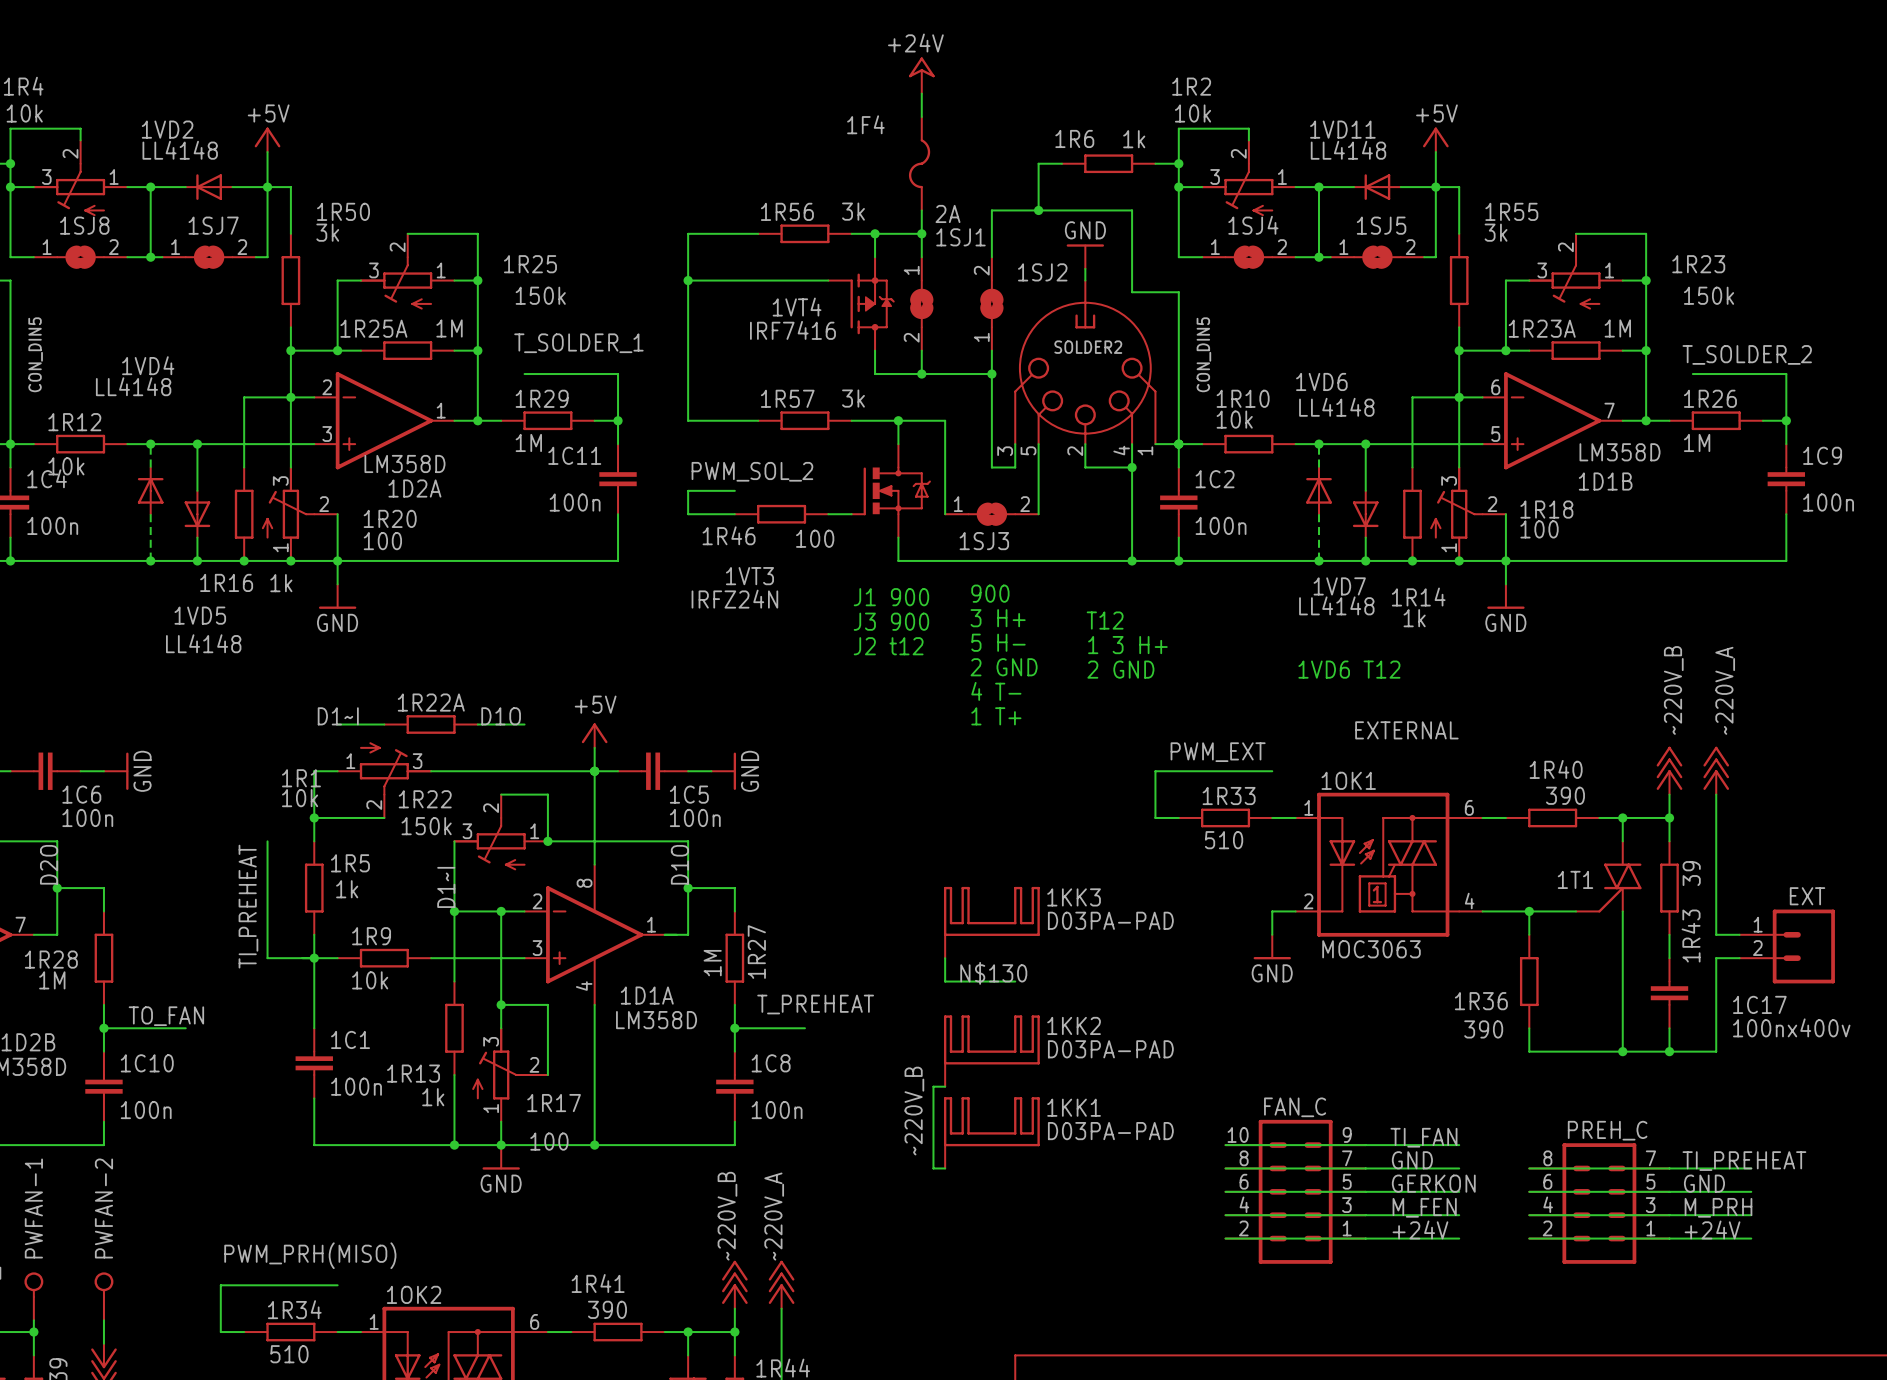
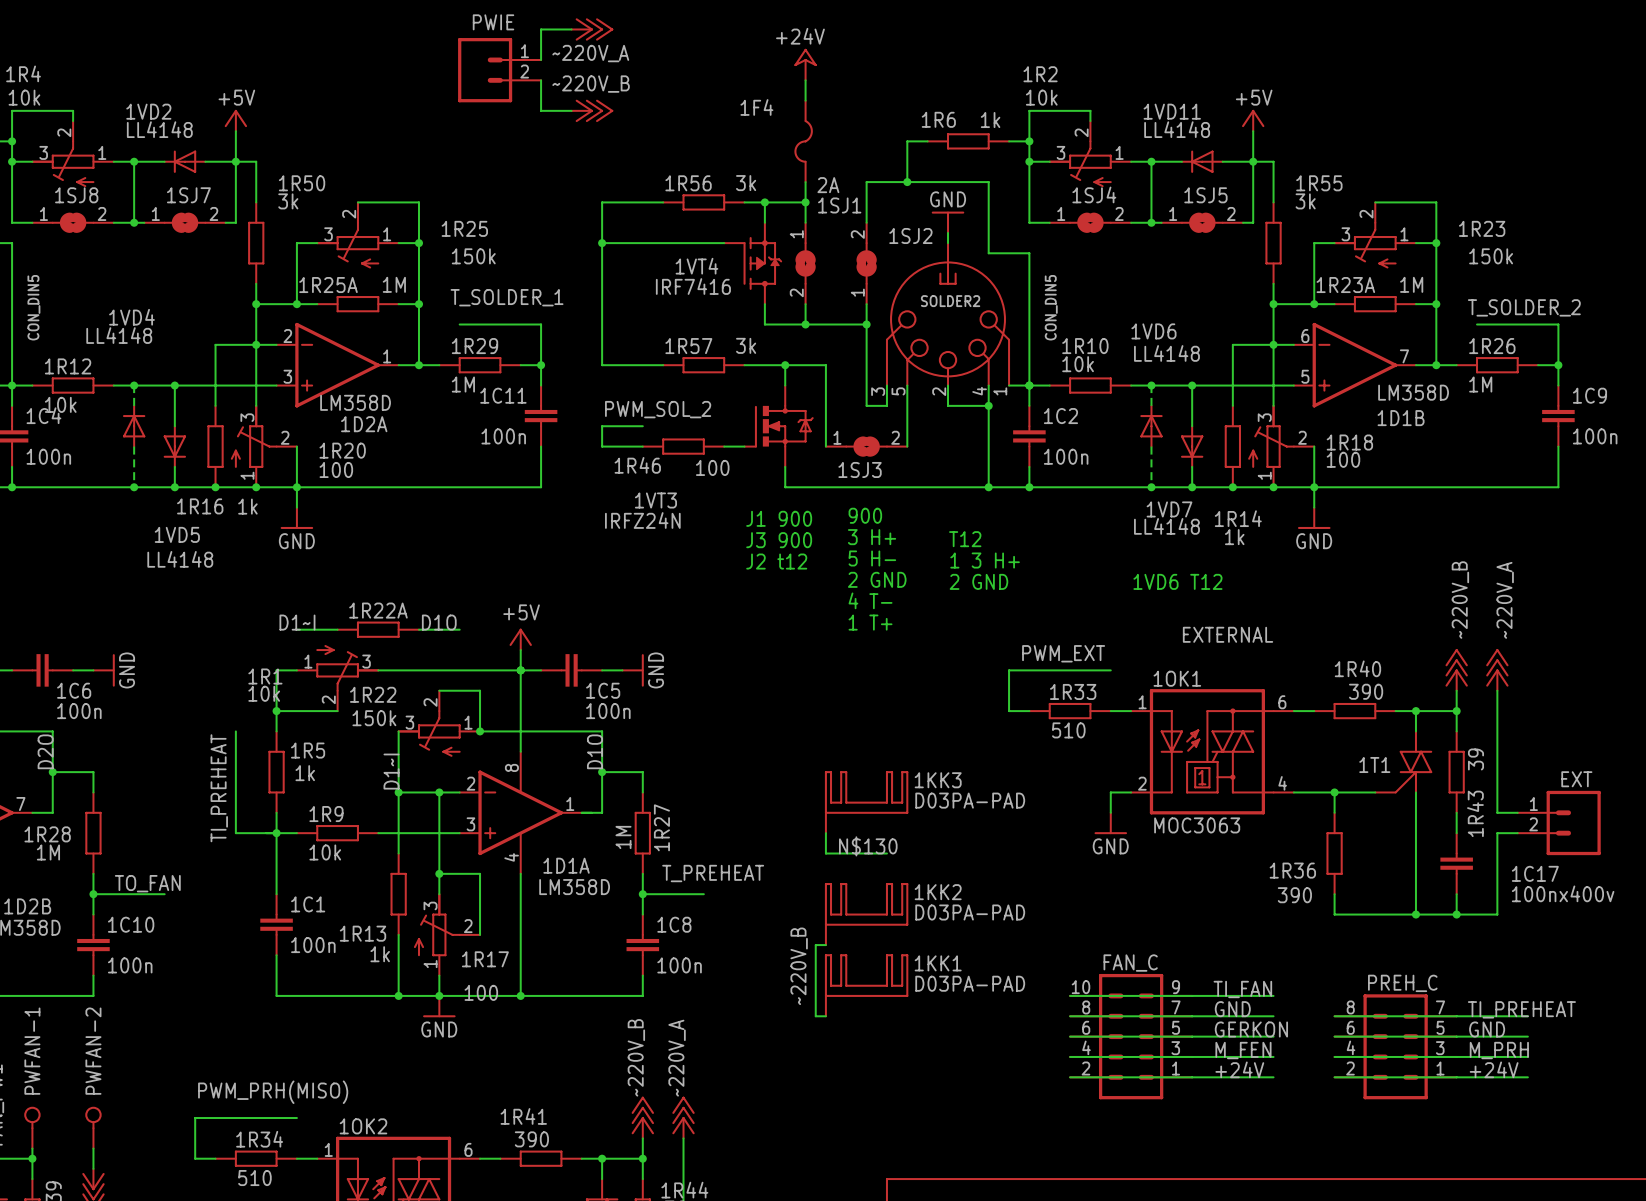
wire: none -> (571, 29) (541, 29) (541, 59)
power symbol: none -> ~220V_A (592, 29)
PWIE: none -> (499, 70)
wire: none -> (541, 80) (541, 110) (571, 110)
power symbol: none -> ~220V_B (592, 110)

